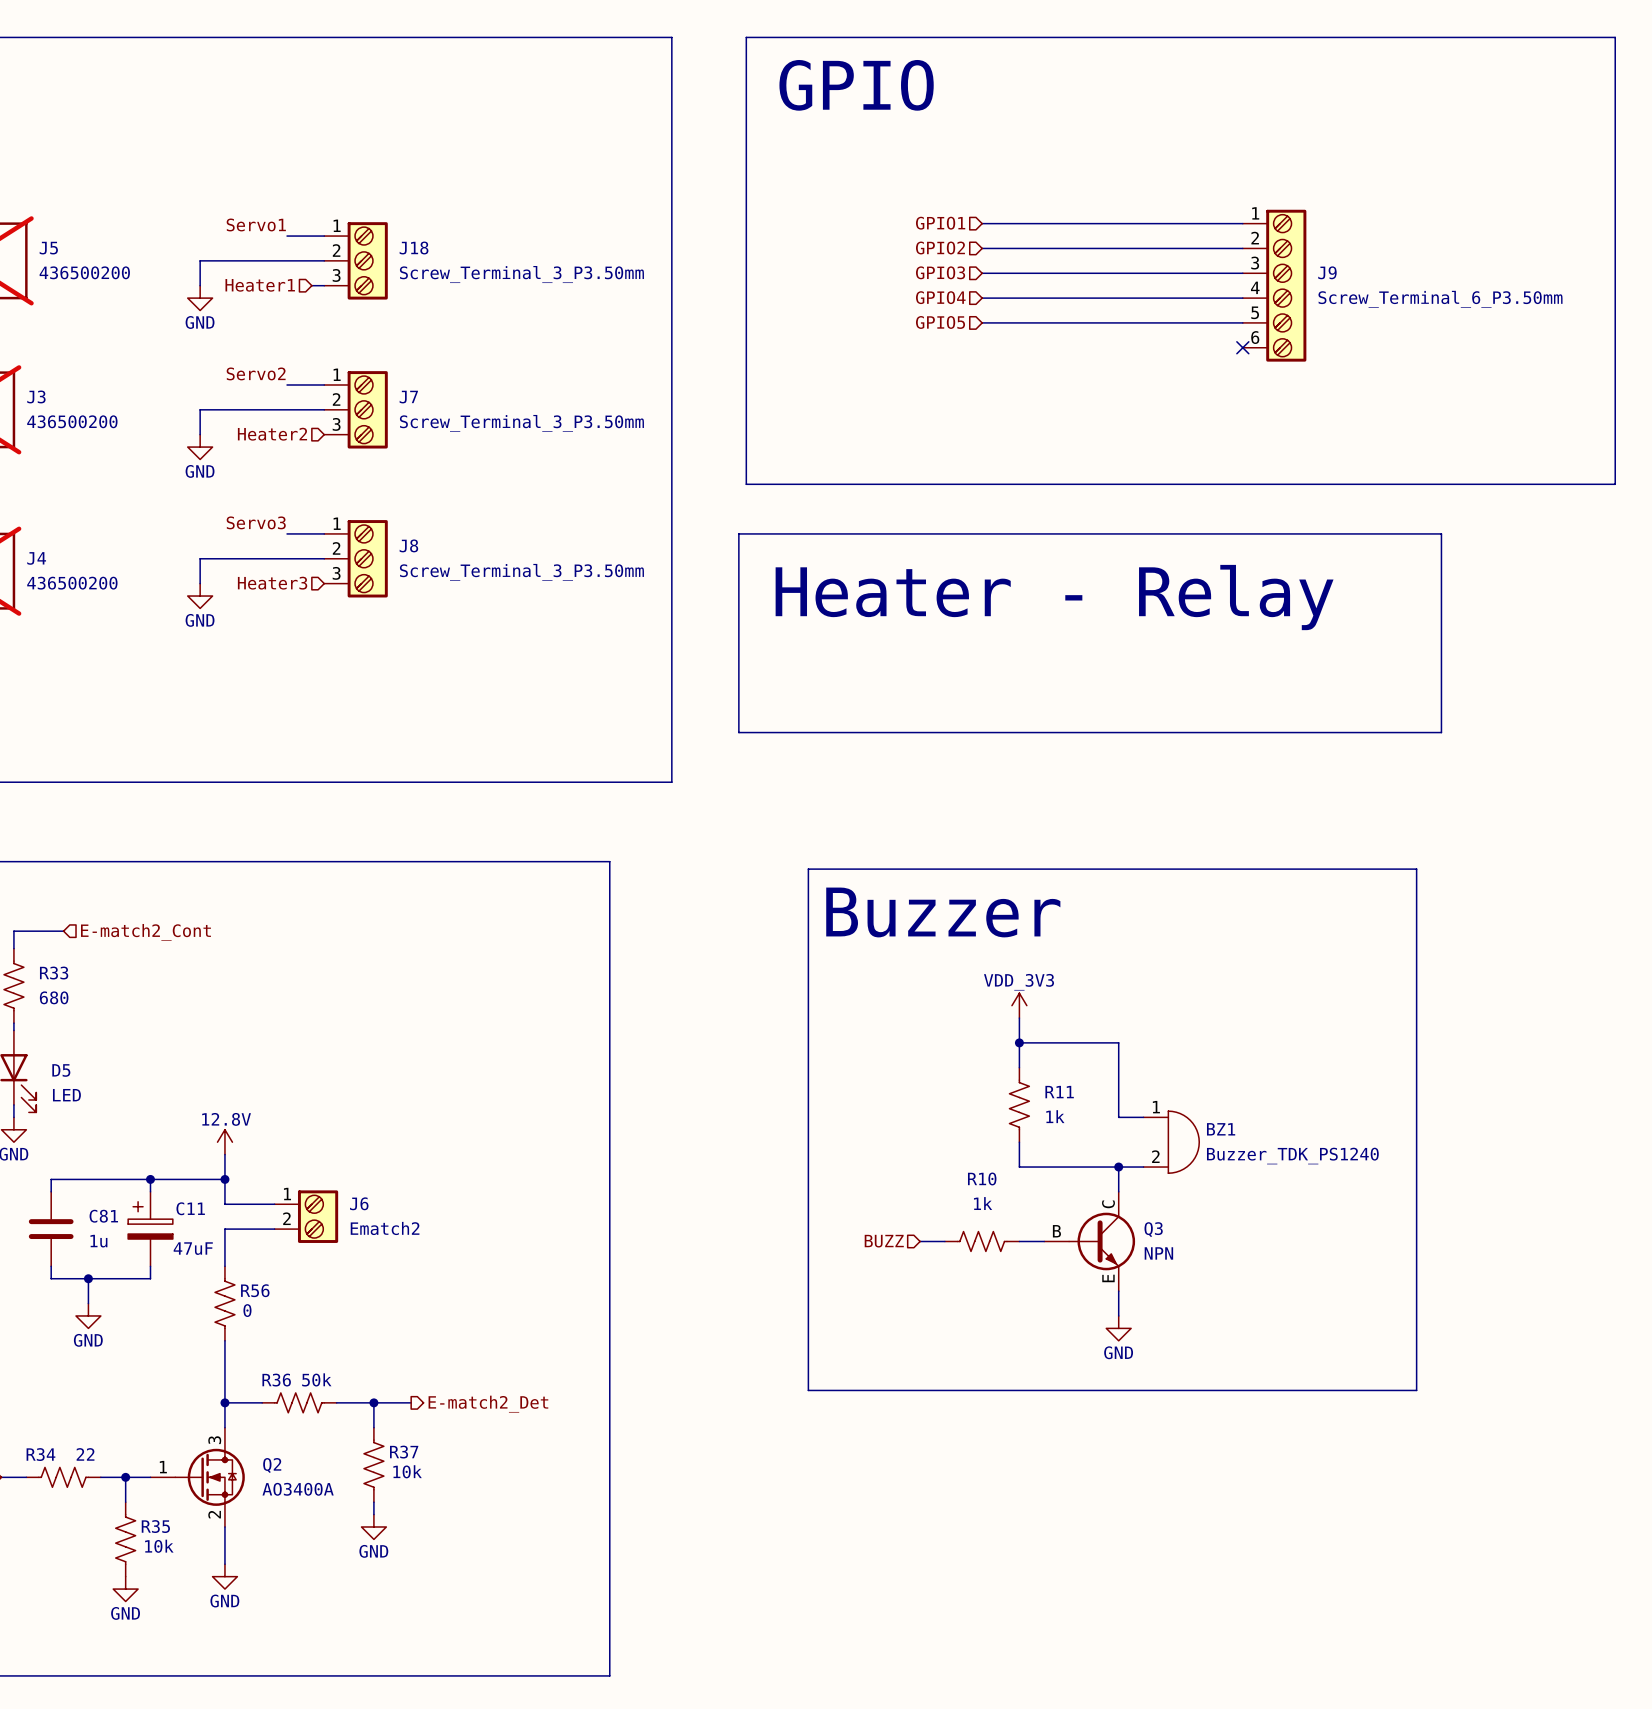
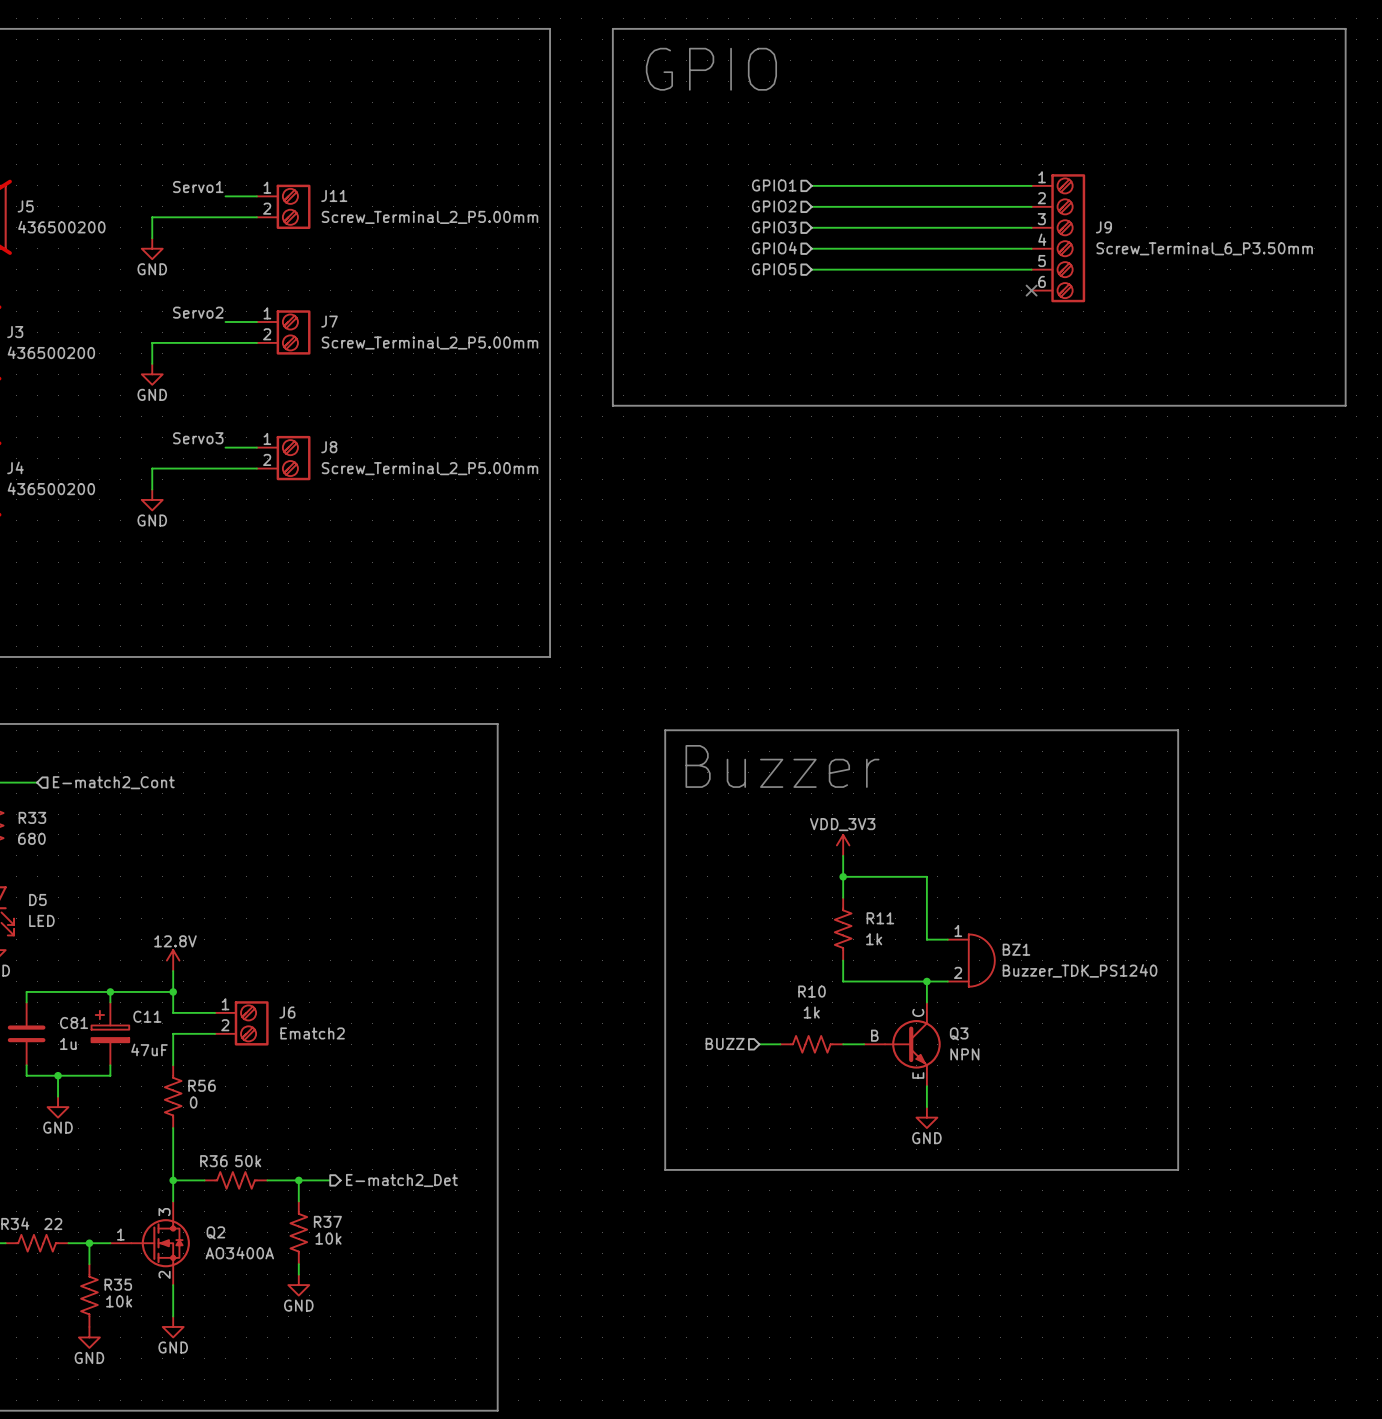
J11: none -> Screw_Terminal_2_P5.00mm (283, 206)
J18: Screw_Terminal_3_P3.50mm (356, 260) -> none
hierarchical label: Heater1 (260, 285) -> none
wire: (311, 285) (324, 285) -> none
J7 symbol: [324, 371, 388, 449] -> [256, 310, 311, 355]
J7 value: Screw_Terminal_3_P3.50mm (521, 423) -> Screw_Terminal_2_P5.00mm (429, 343)
hierarchical label: Heater2 (272, 434) -> none
J8 symbol: [324, 520, 388, 598] -> [256, 435, 311, 481]
line: (738, 533) (1441, 533) (1441, 732) (738, 732) (738, 533) -> none
J8 value: Screw_Terminal_3_P3.50mm (521, 572) -> Screw_Terminal_2_P5.00mm (429, 468)
hierarchical label: Heater3 (272, 583) -> none
text: Heater - Relay (1054, 597) -> none

